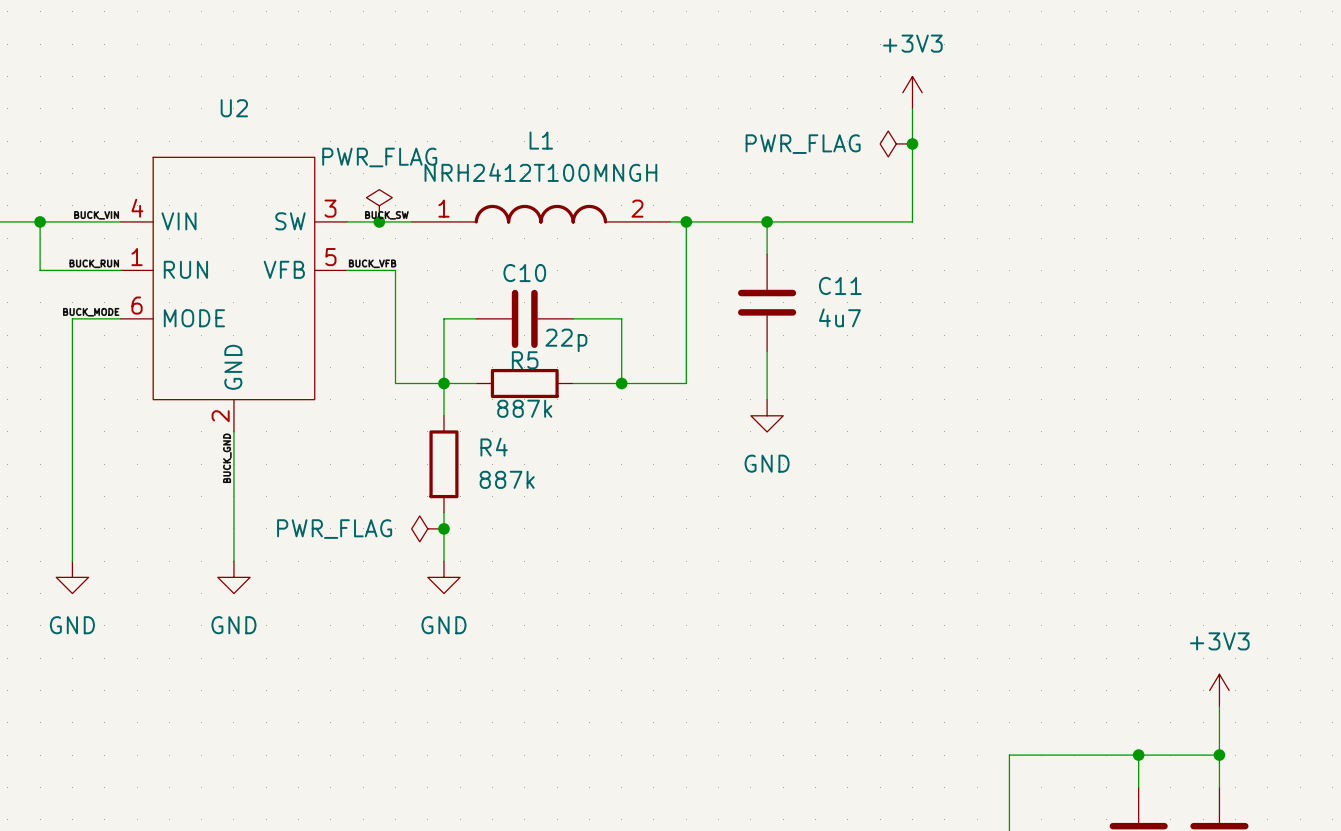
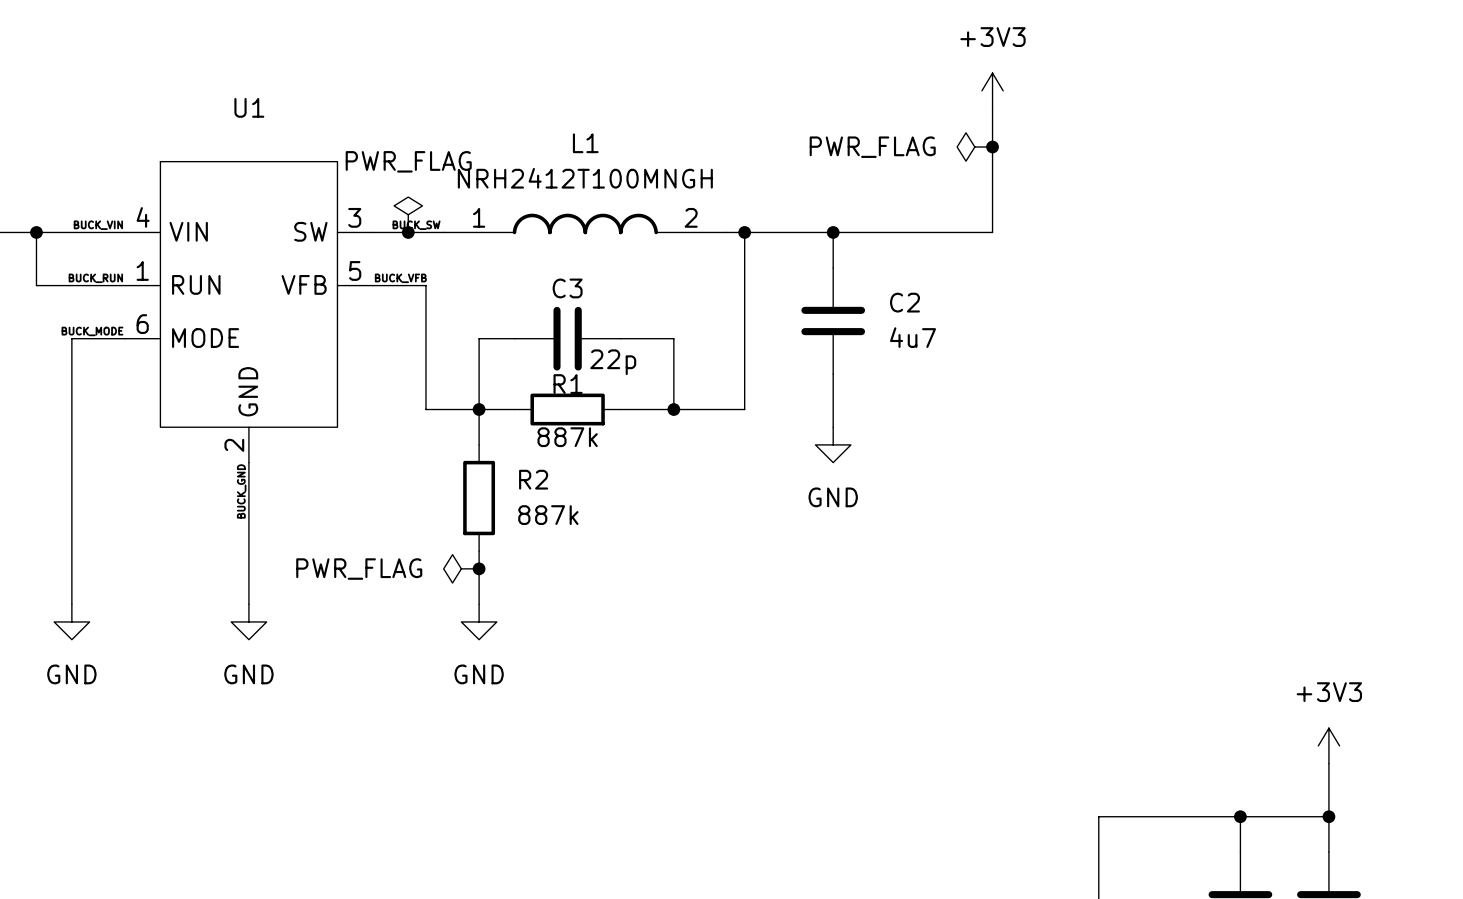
U2 name: U2 (234, 108) -> U1 (249, 107)
C10 name: C10 (524, 273) -> C3 (567, 288)
C11 name: C11 (840, 285) -> C2 (904, 302)
R5 name: R5 (525, 360) -> R1 (568, 384)
R4 name: R4 (494, 447) -> R2 (533, 479)

